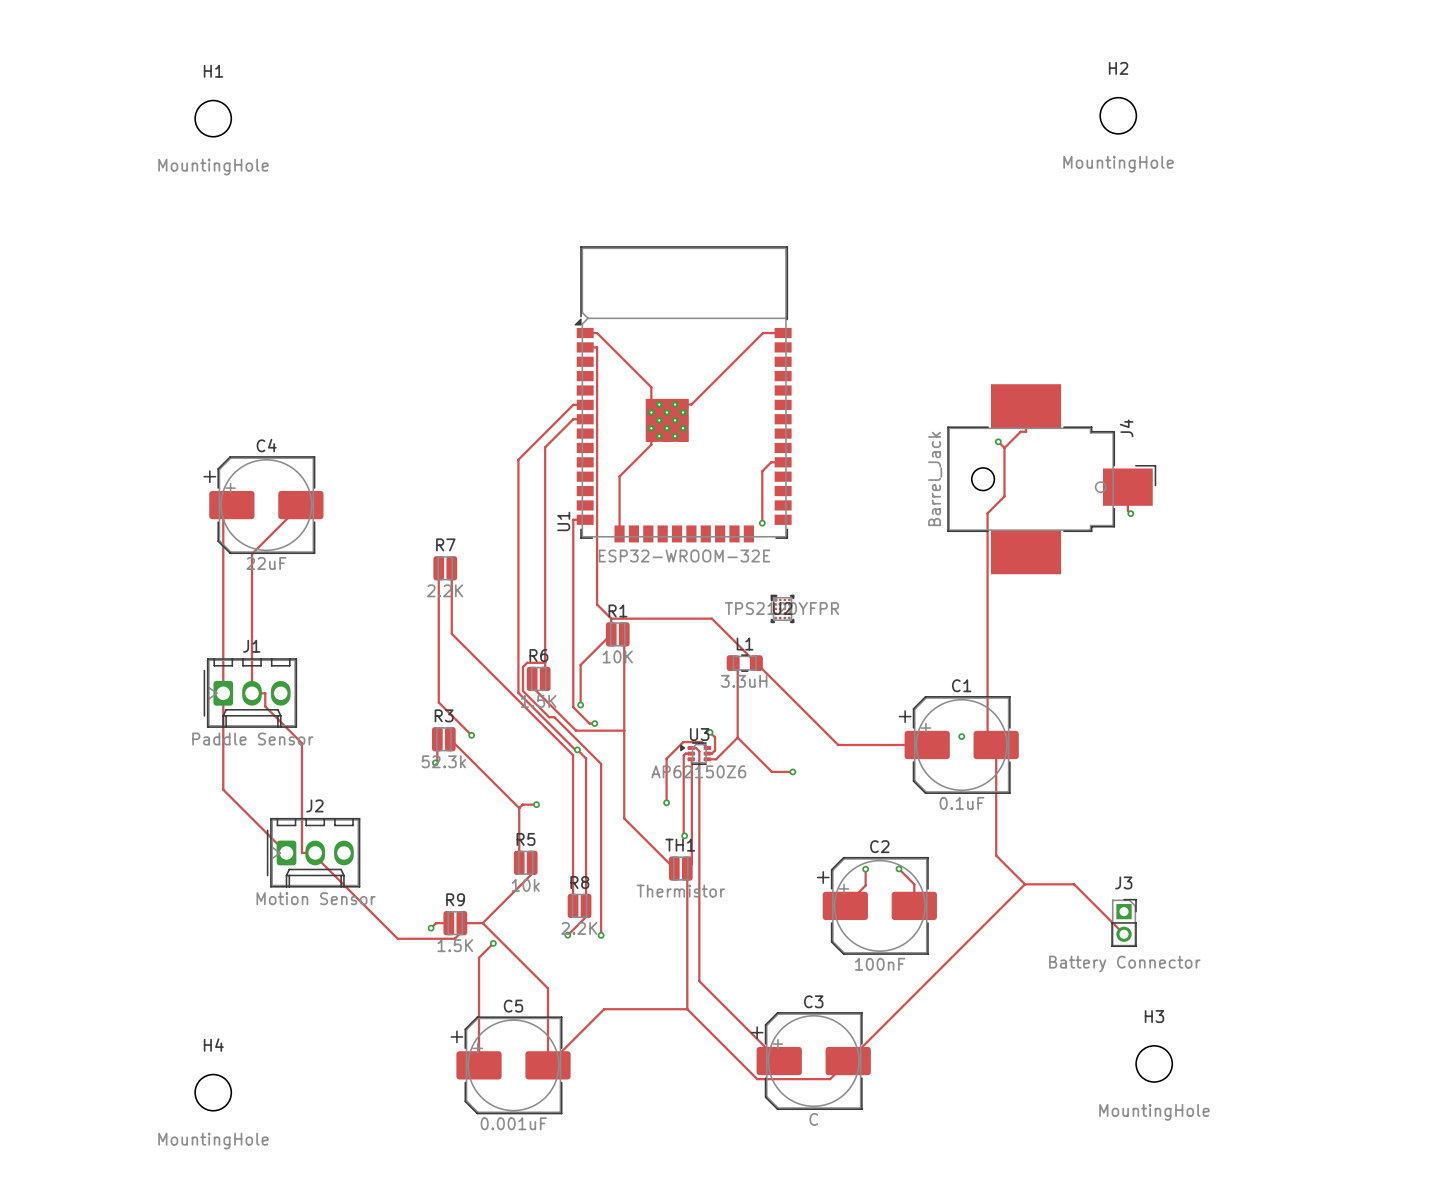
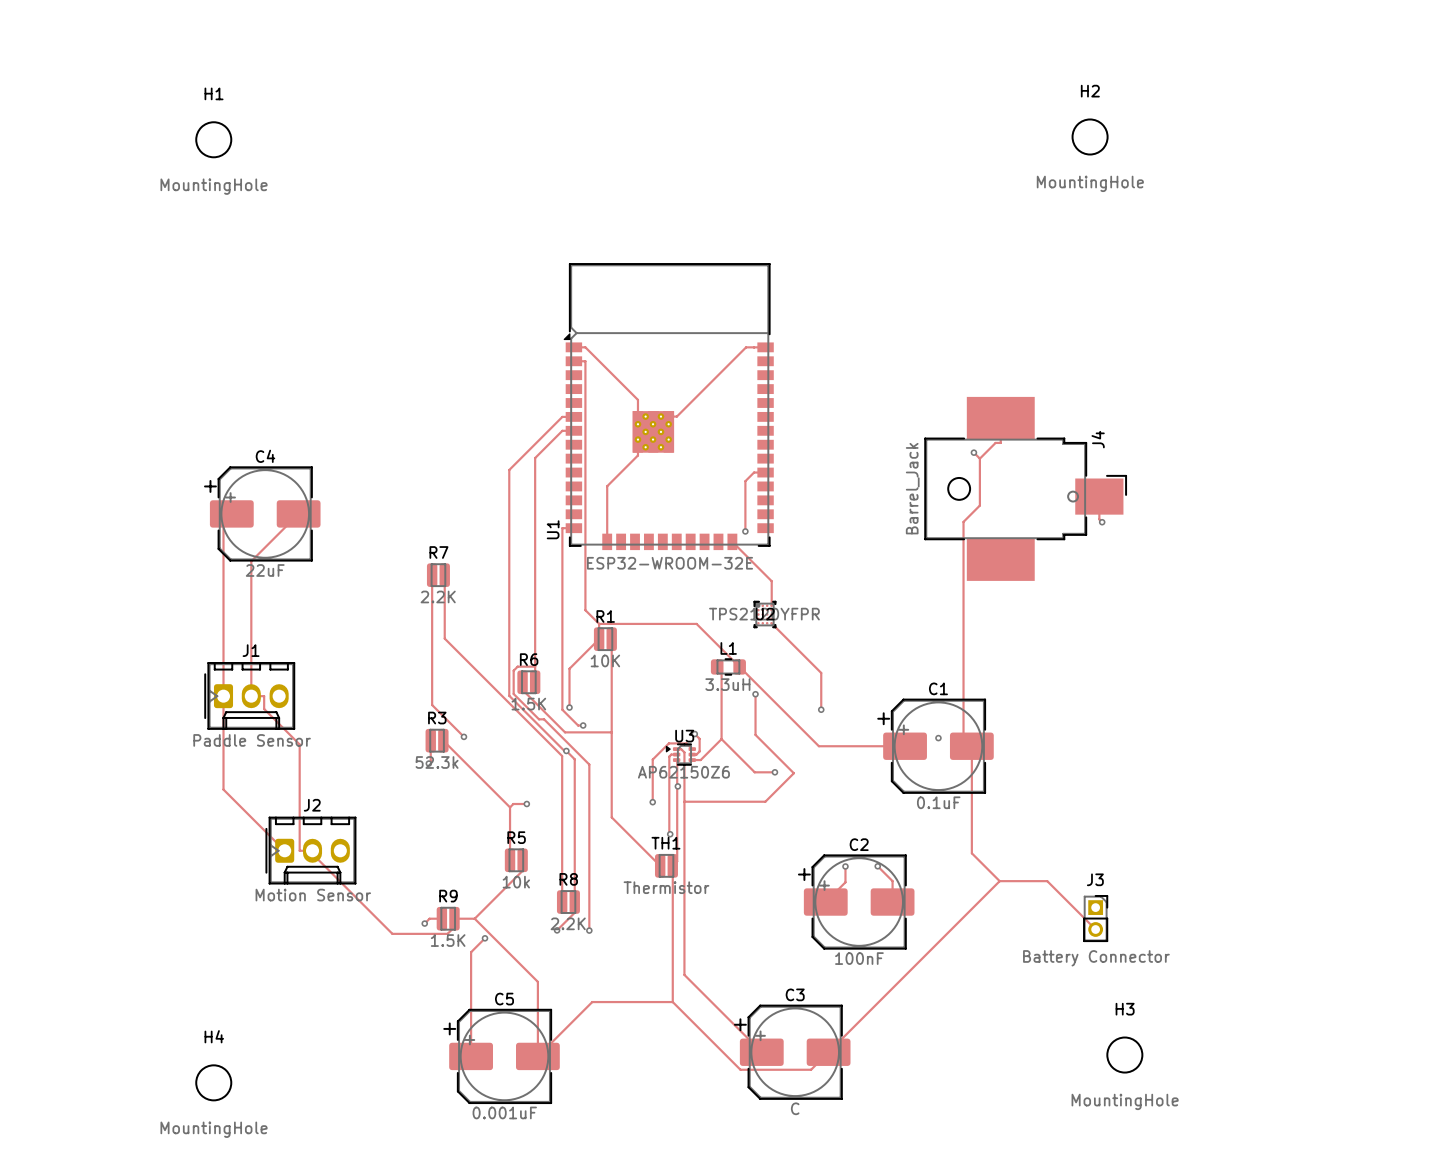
track: none -> (732, 541) (771, 581) (771, 605)
track: none -> (771, 623) (821, 672) (821, 709)
track: none -> (755, 694) (755, 734) (793, 773) (765, 801) (684, 801)
via: none -> (755, 694)
via: none -> (821, 709)
via: none -> (677, 786)

